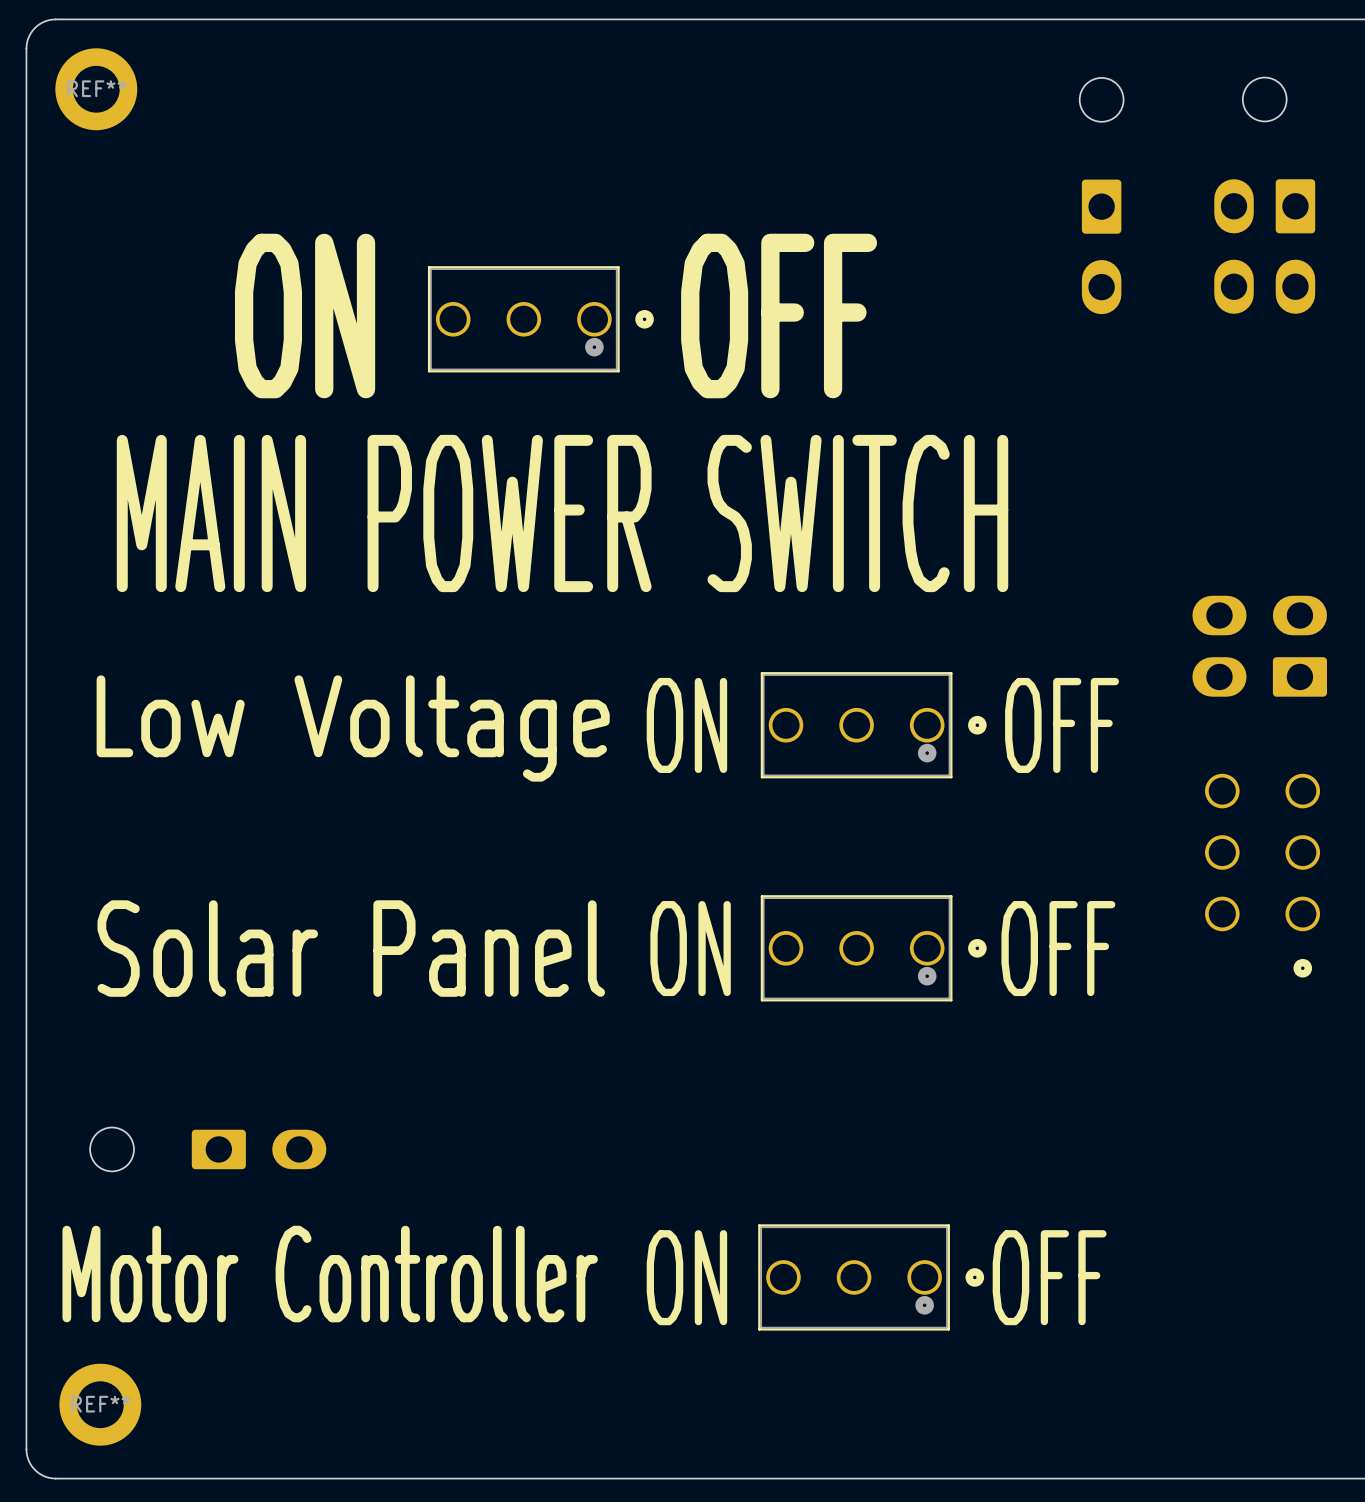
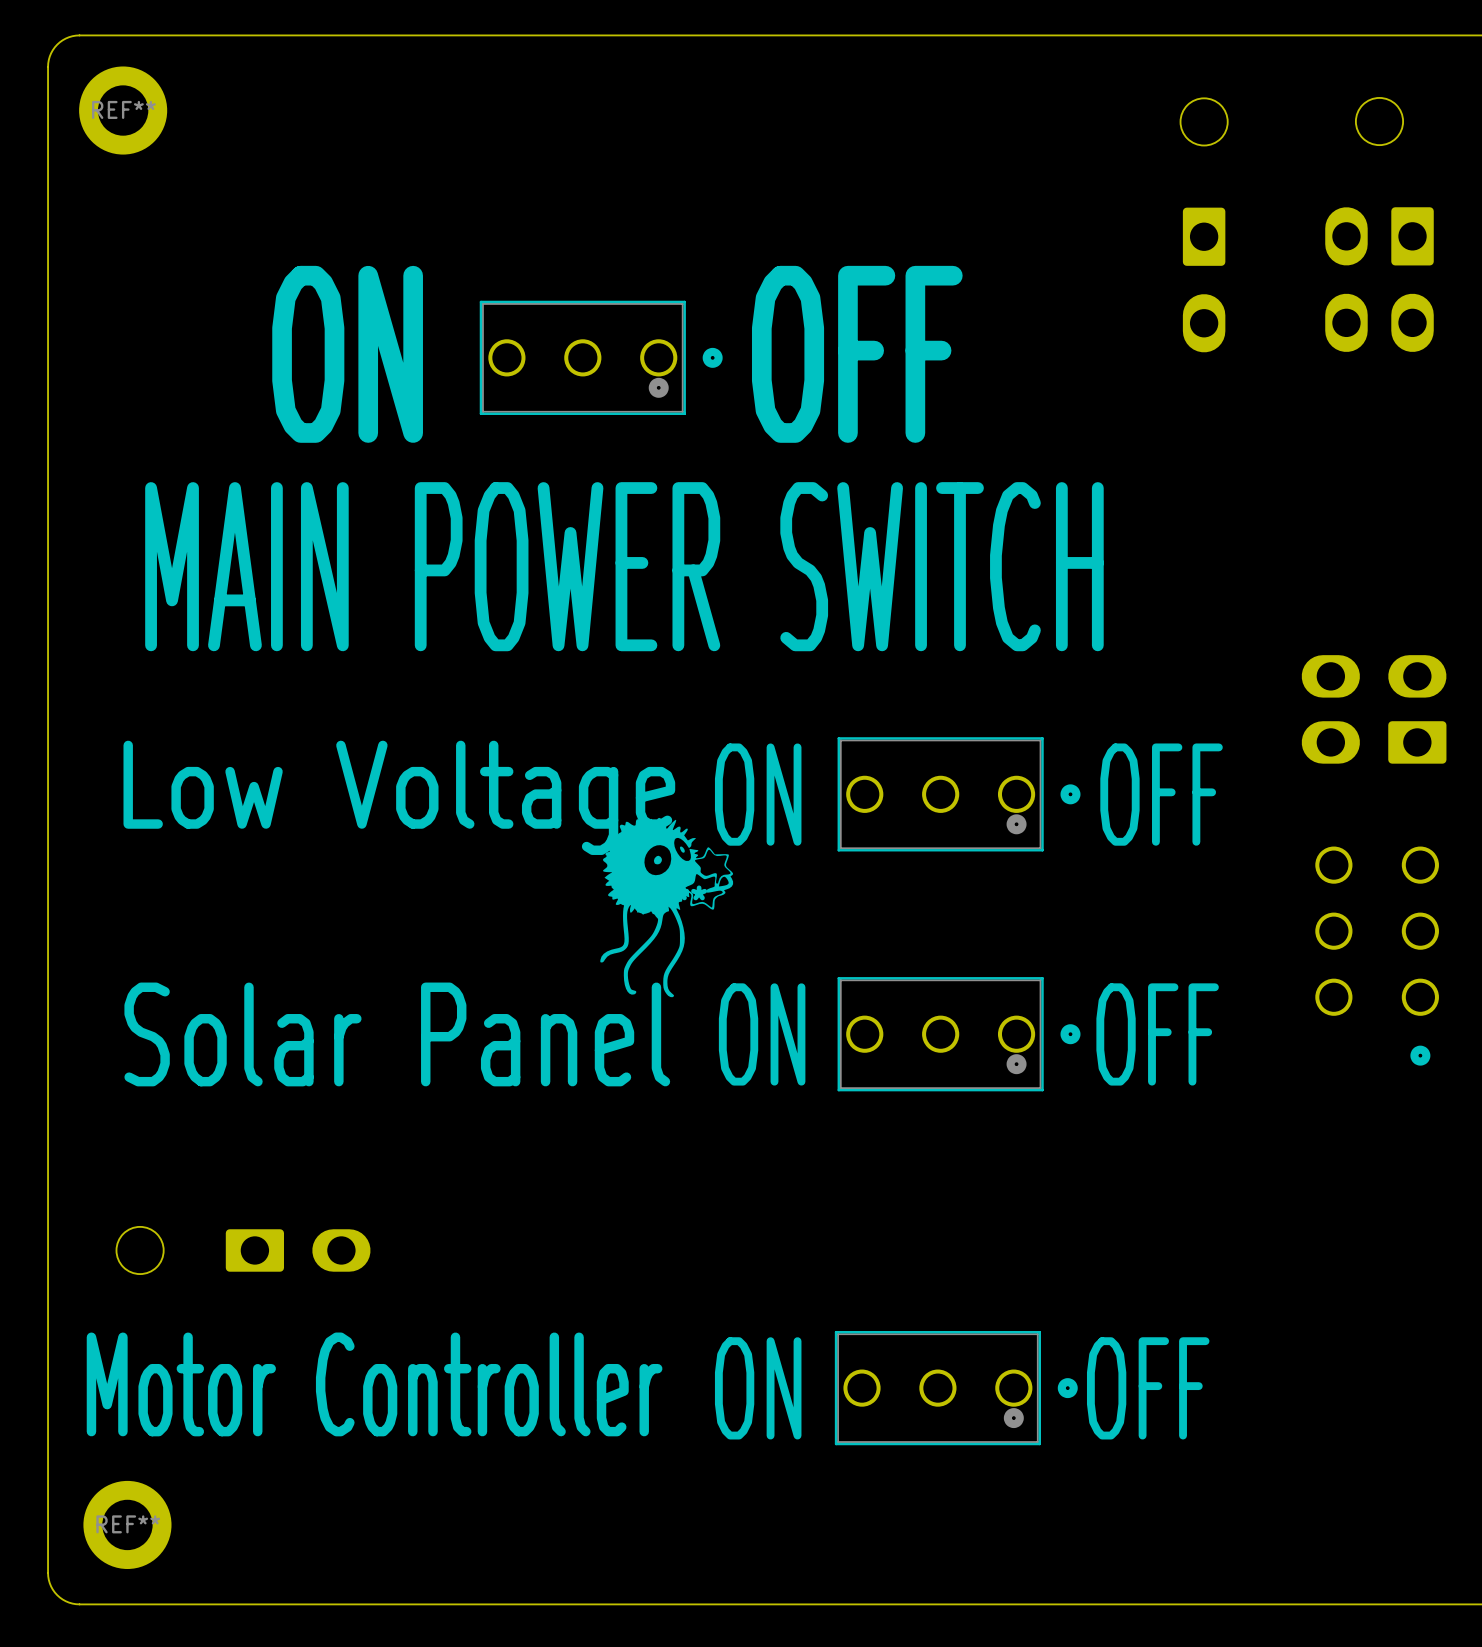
part: none -> (666, 906)

